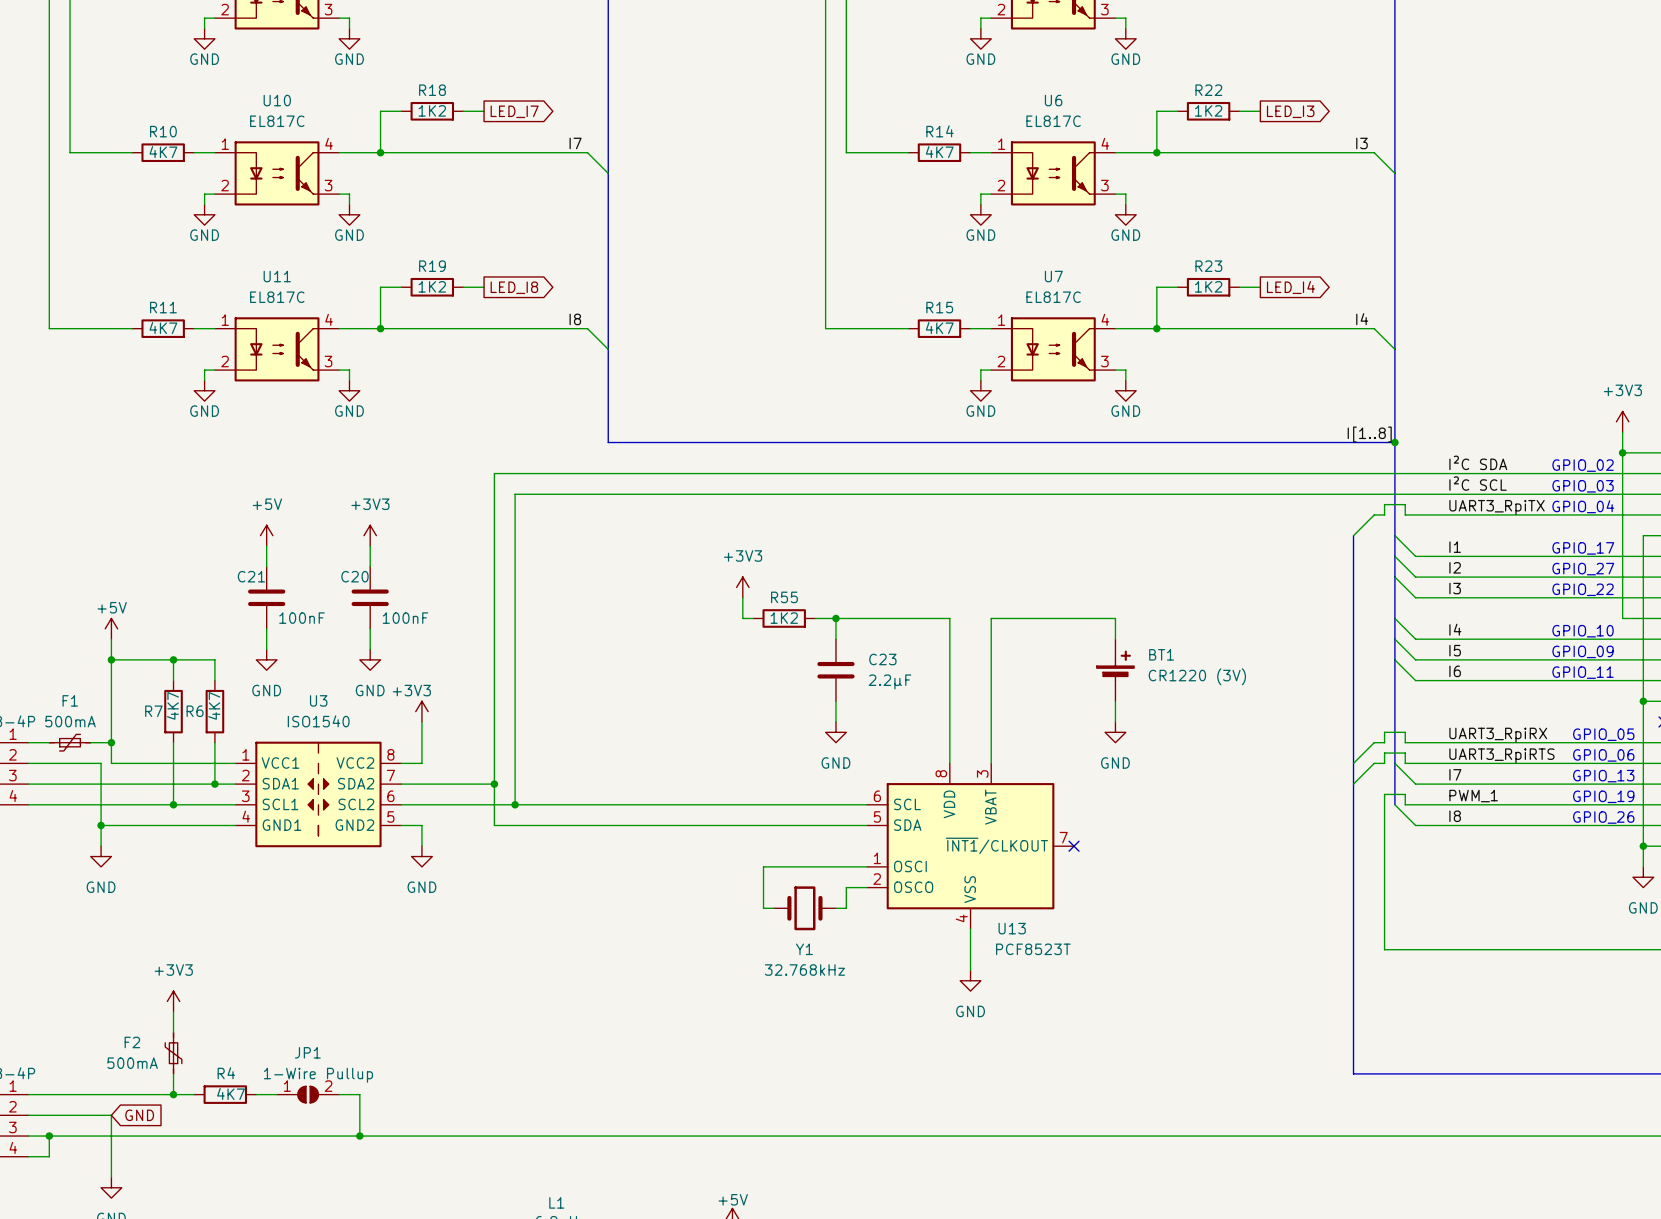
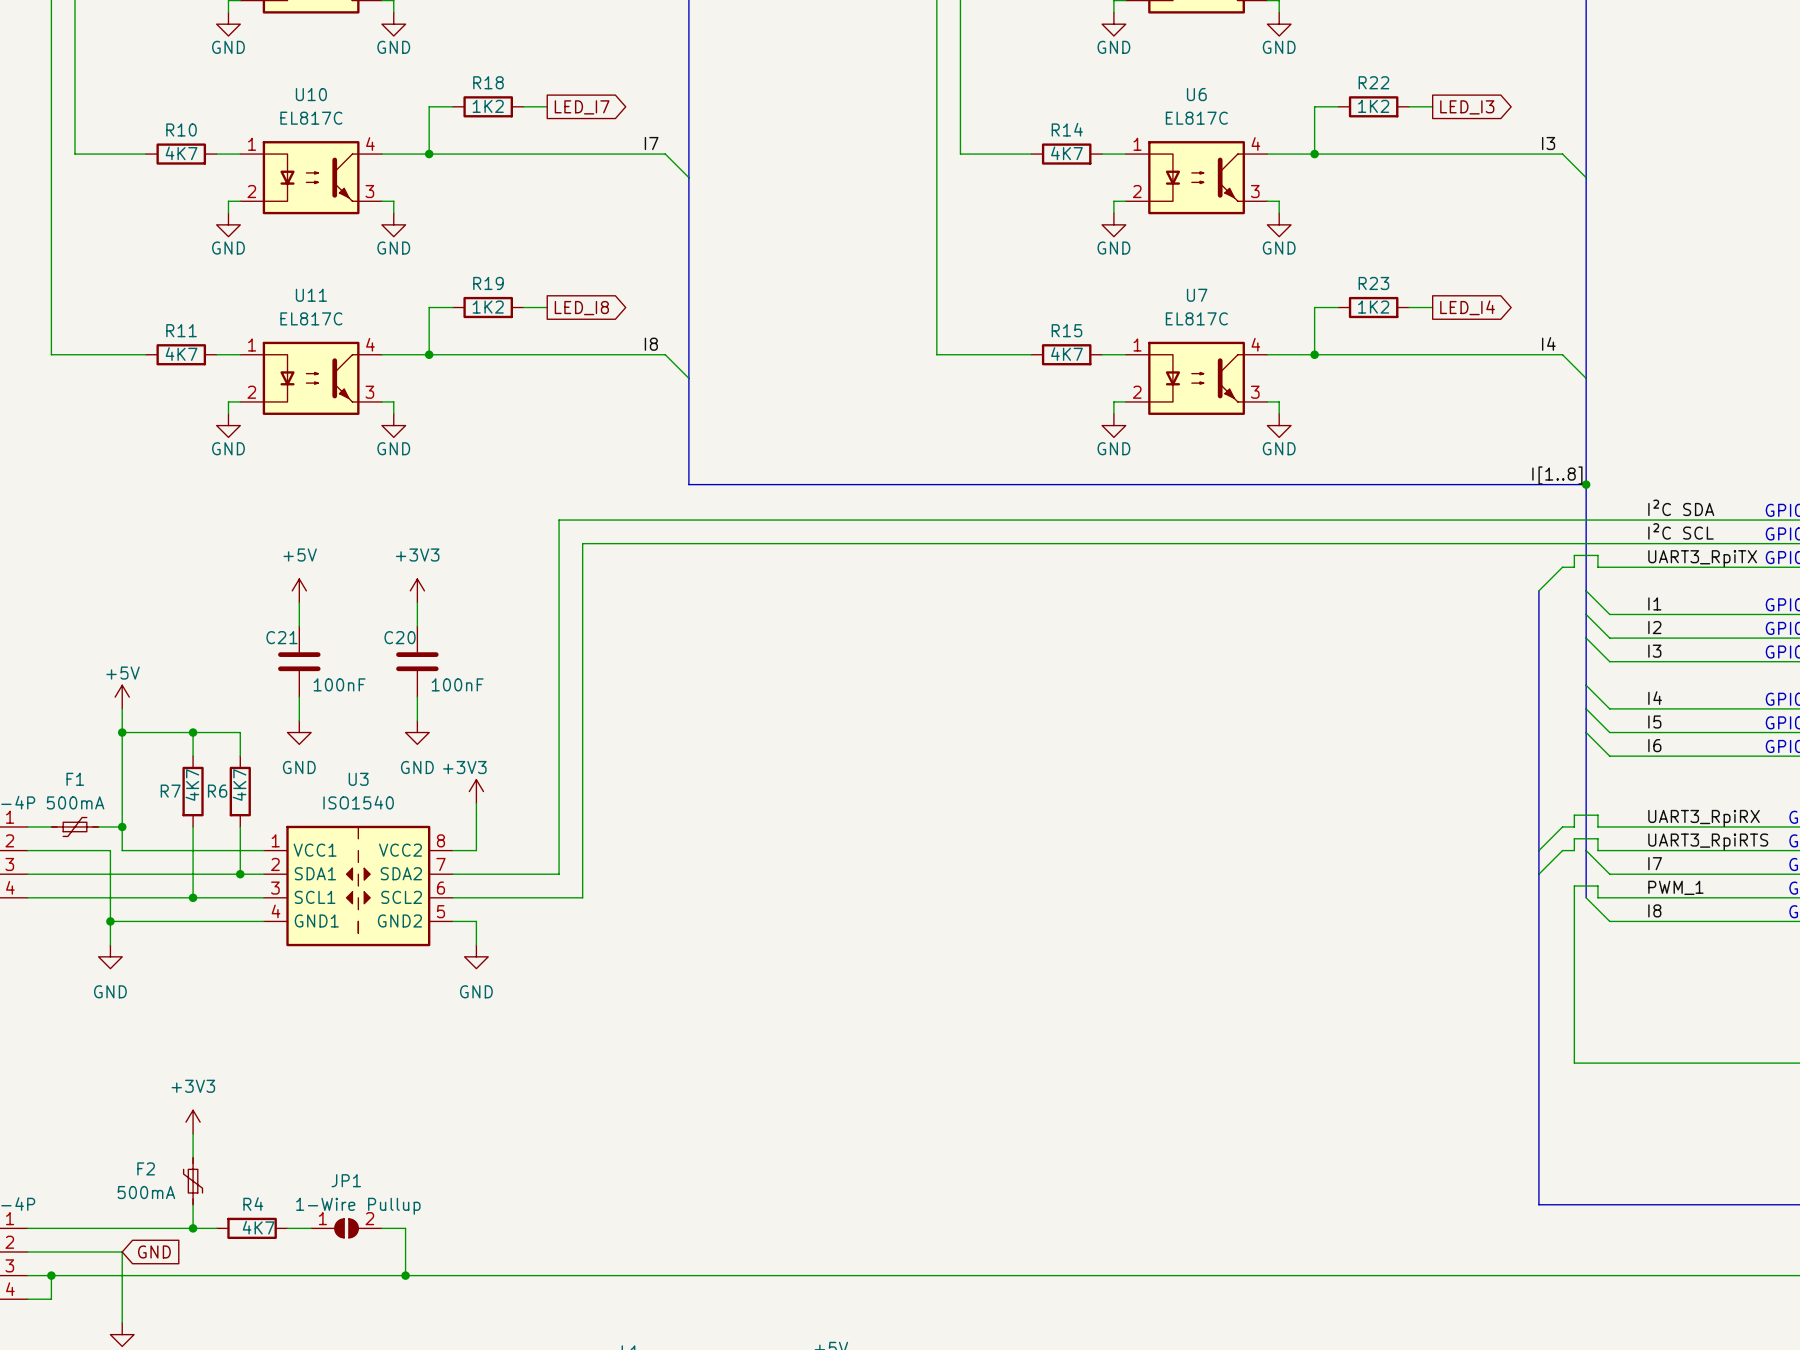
power symbol: +3V3 (742, 587) -> none
wire: (742, 597) (742, 618) (753, 618) -> none
R55: 1K2 (784, 618) -> none
wire: (815, 618) (949, 618) (949, 763) -> none
wire: (835, 618) (835, 639) -> none
junction: (835, 618) -> none
wire: (1115, 639) (1115, 618) (991, 618) (991, 763) -> none
C23: 2.2µF (835, 670) -> none
BT1: CR1220 (3V) (1115, 670) -> none
wire: (835, 701) (835, 721) -> none
wire: (1115, 701) (1115, 721) -> none
power symbol: GND (835, 732) -> none
power symbol: GND (1115, 732) -> none
wire: (494, 784) (494, 825) (867, 825) -> none
junction: (494, 784) -> none
wire: (515, 804) (867, 804) -> none
junction: (515, 804) -> none
U13: PCF8523T (970, 846) -> none
no-connect mark: (1074, 846) -> none
wire: (867, 866) (763, 866) (763, 908) (773, 908) -> none
wire: (867, 887) (846, 887) (846, 908) (835, 908) -> none
Y1: 32.768kHz (804, 908) -> none
wire: (970, 929) (970, 970) -> none
power symbol: GND (970, 980) -> none

